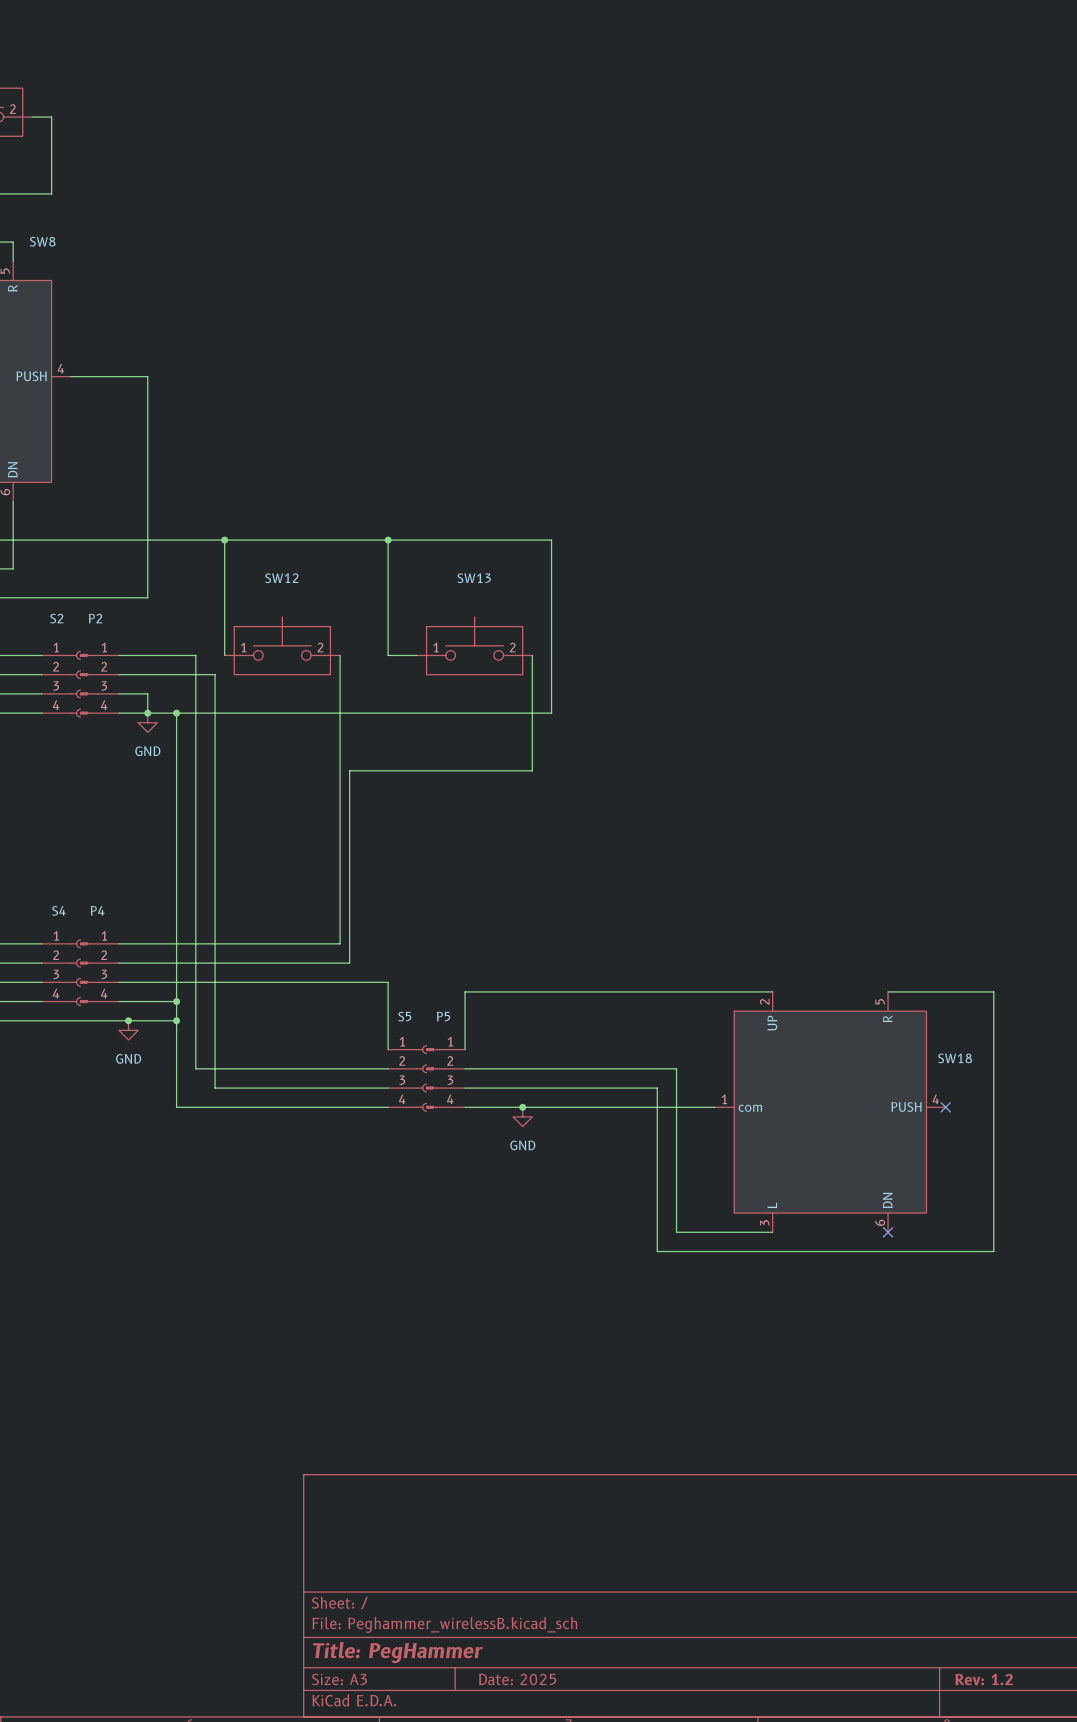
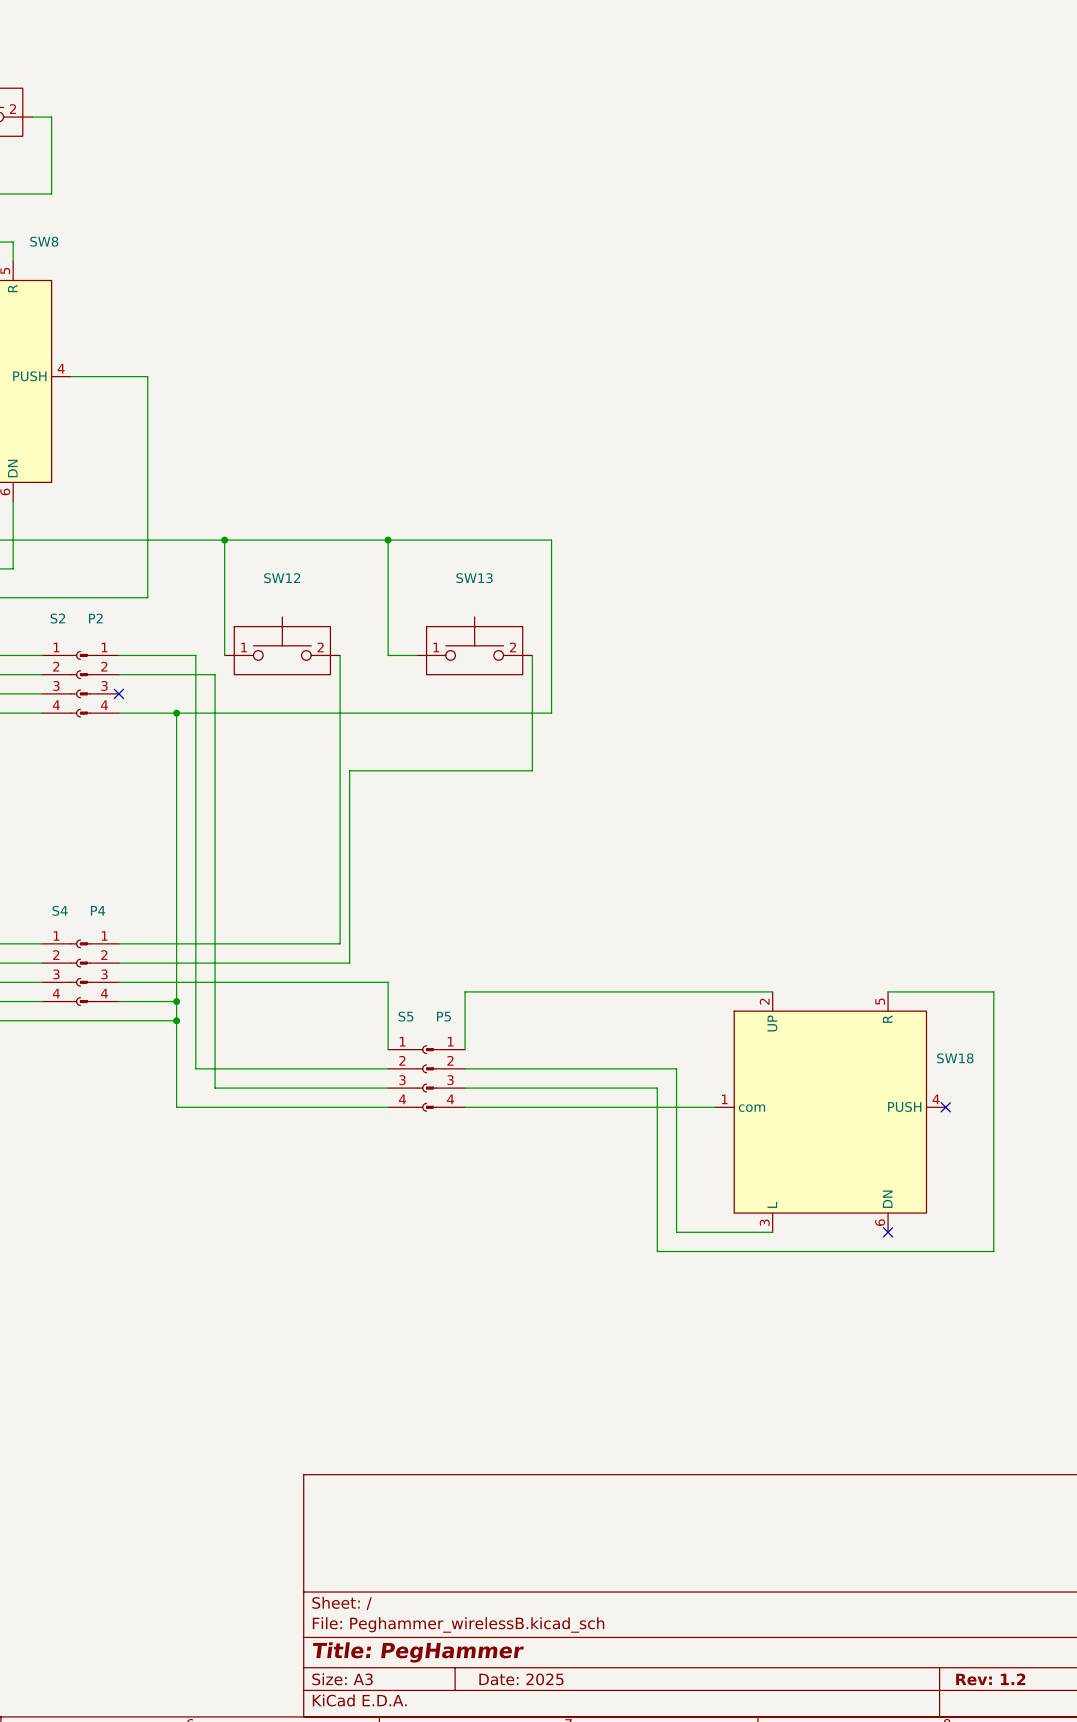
wire: (118, 693) (147, 693) (147, 713) -> none
no-connect mark: none -> (118, 693)
junction: (147, 713) -> none
power symbol: GND (147, 722) -> none
junction: (128, 1020) -> none
power symbol: GND (128, 1030) -> none
junction: (522, 1107) -> none
power symbol: GND (522, 1116) -> none

